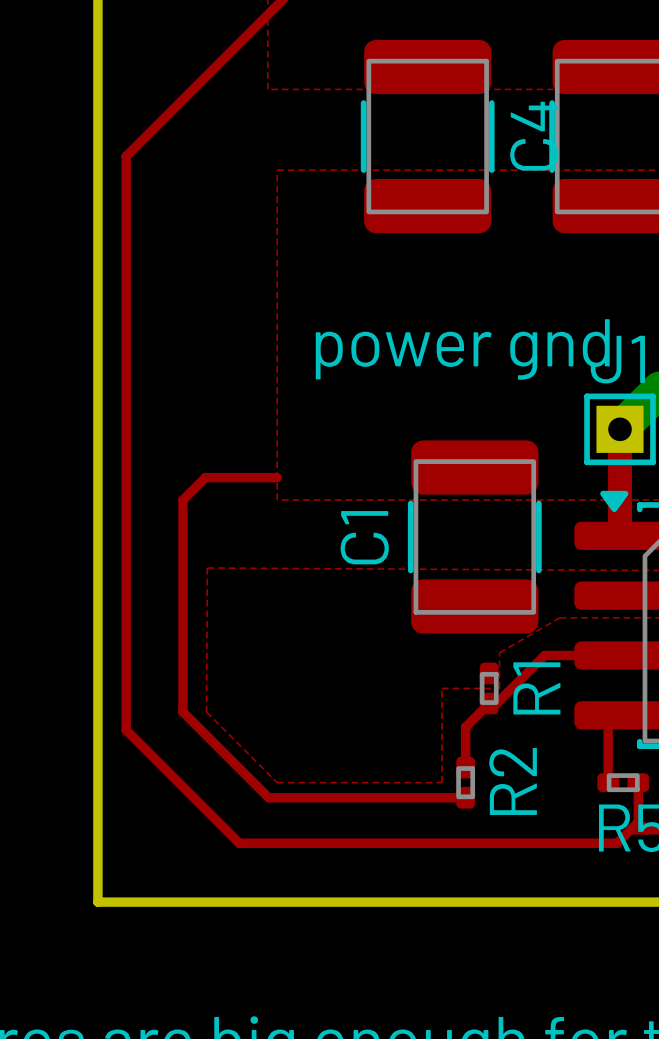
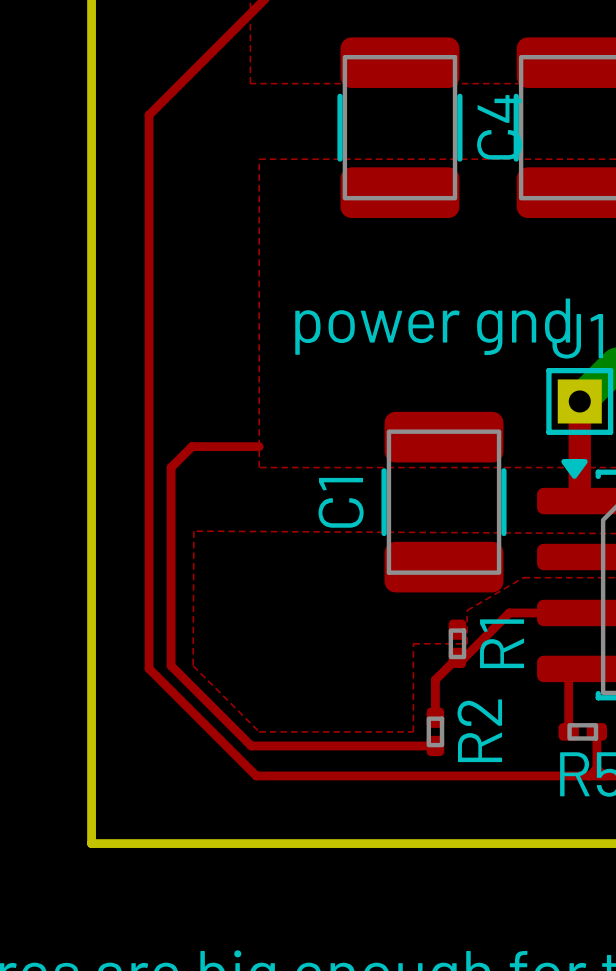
top track: (159, 123) (126, 156) (126, 730) (239, 843) (617, 843) (630, 829) -> (149, 115) (149, 668) (256, 775) (589, 775)

